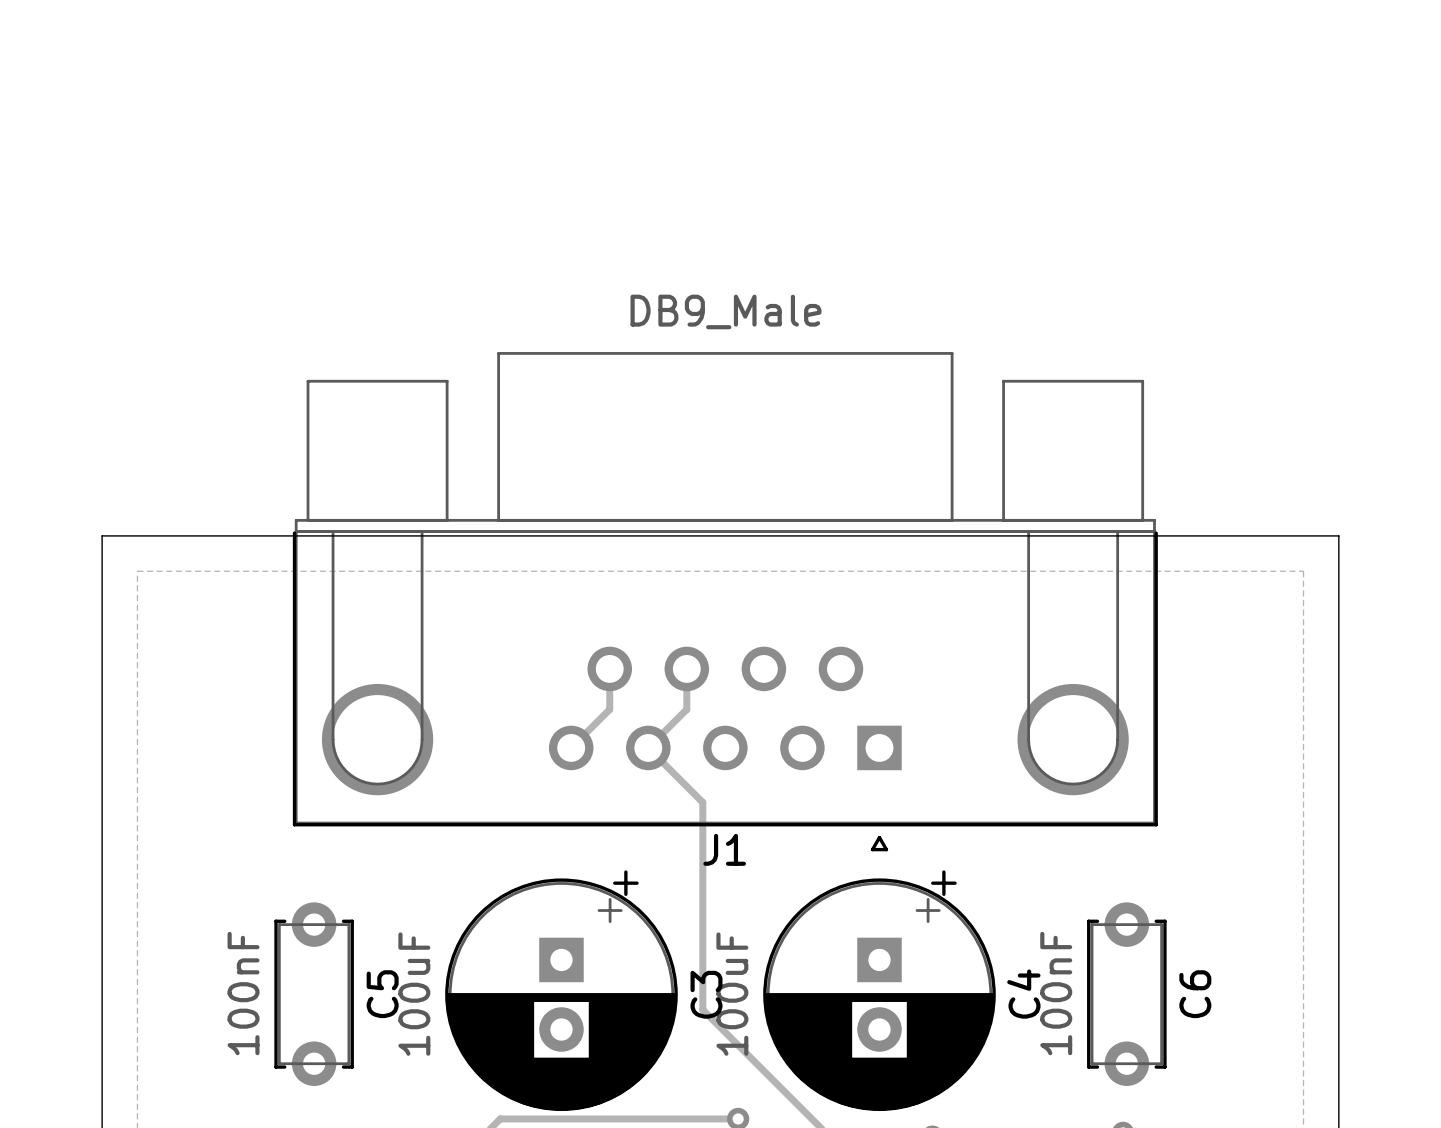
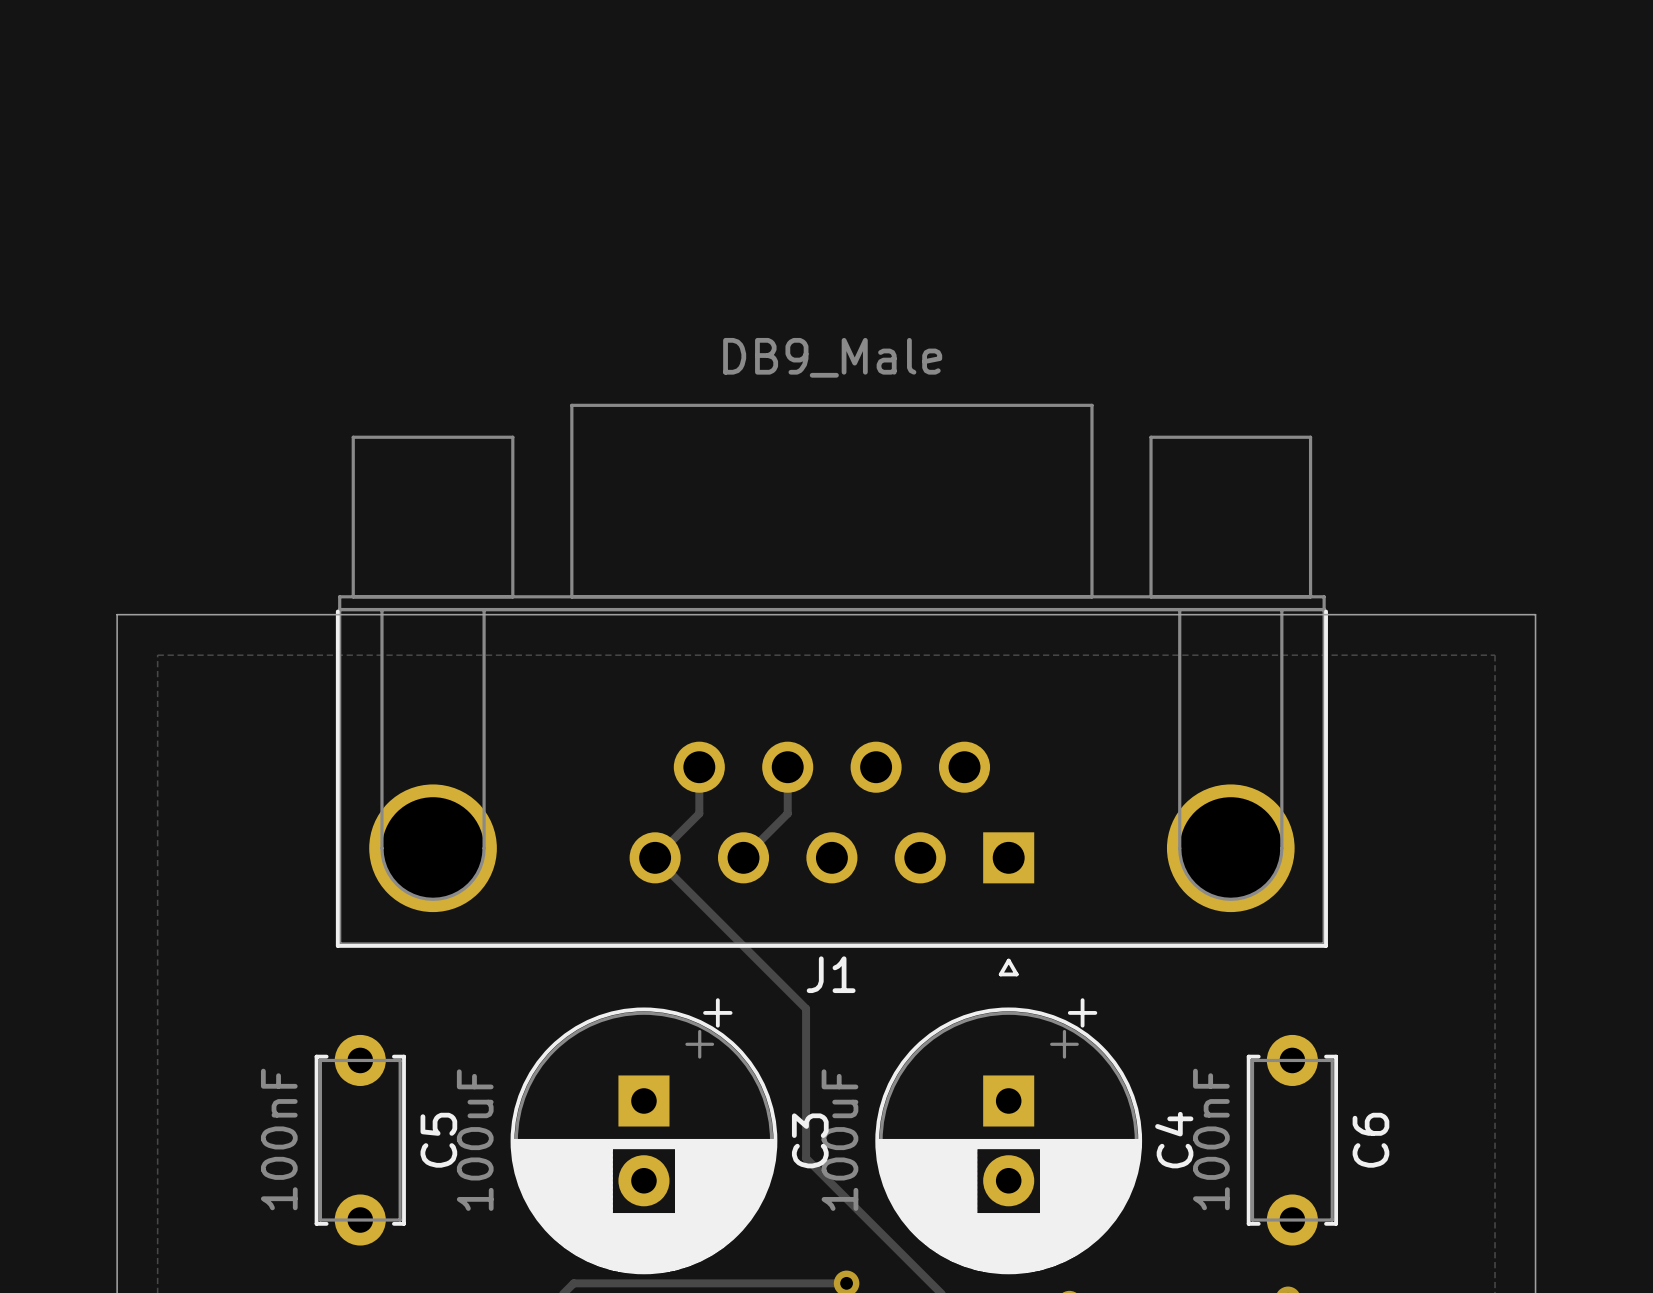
track: (648, 747) (702, 802) (702, 879) -> (655, 857) (806, 1008)

